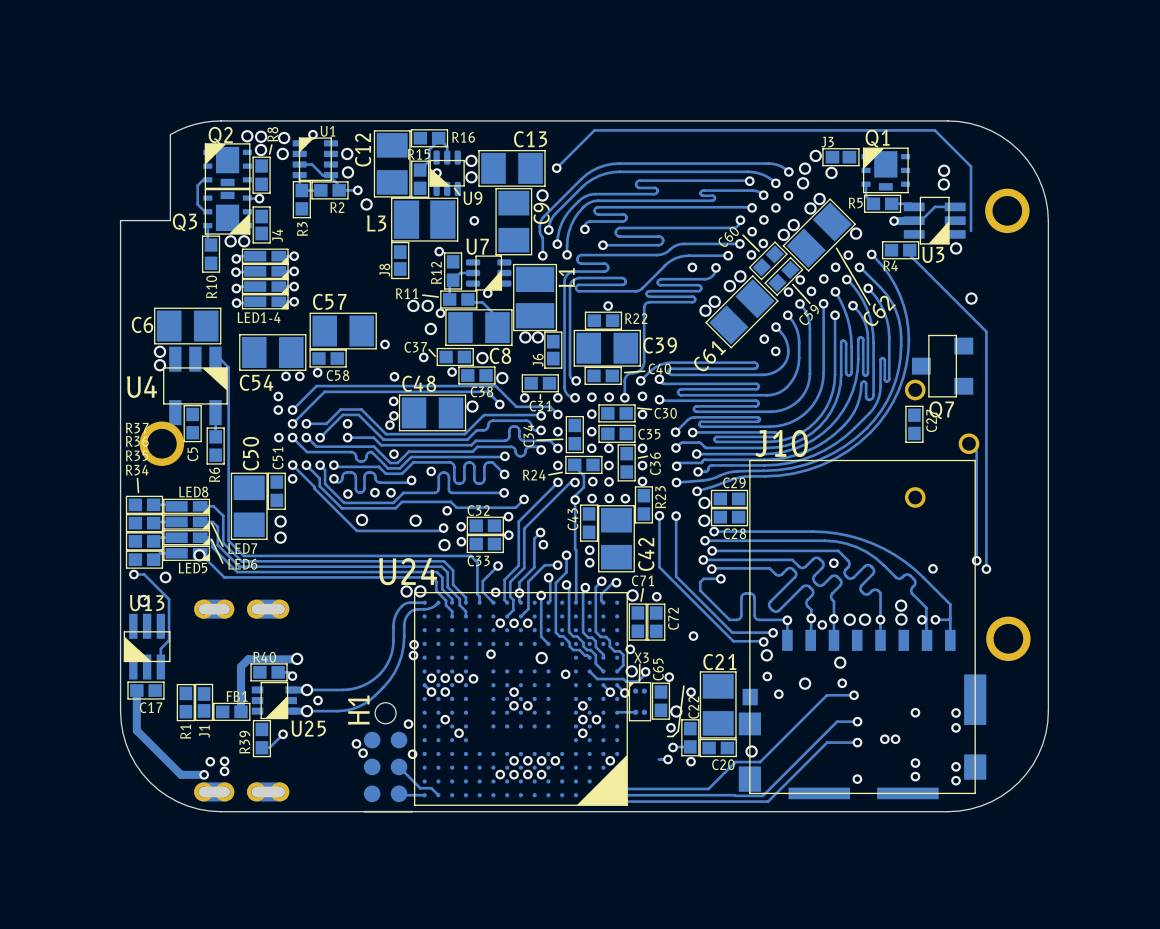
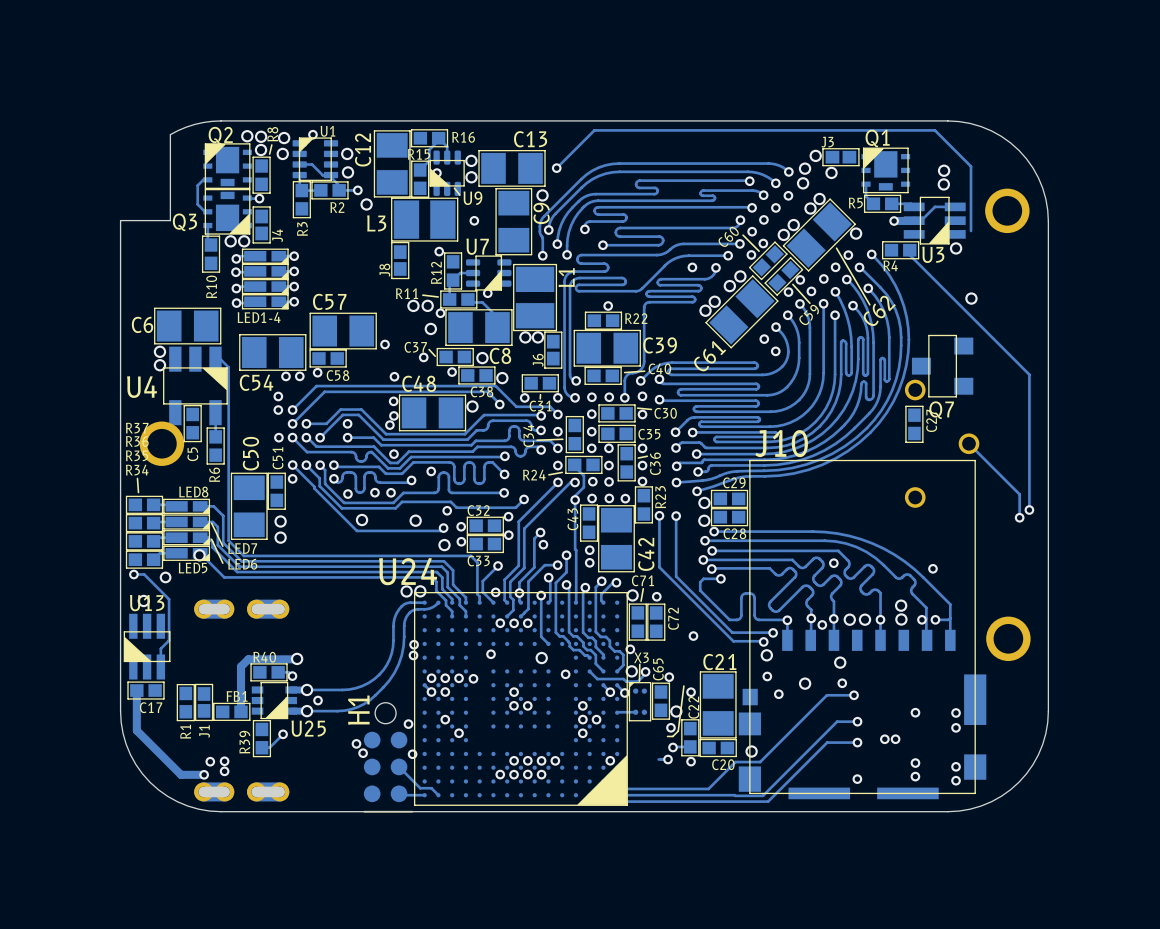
track: (986, 331) (986, 569) -> (986, 331) (1029, 374) (1029, 510)
track: (976, 451) (976, 560) -> (976, 451) (1019, 494) (1019, 517)
via: none -> (1029, 510)
via: none -> (1019, 517)
via: (976, 560) -> none
via: (986, 569) -> none

